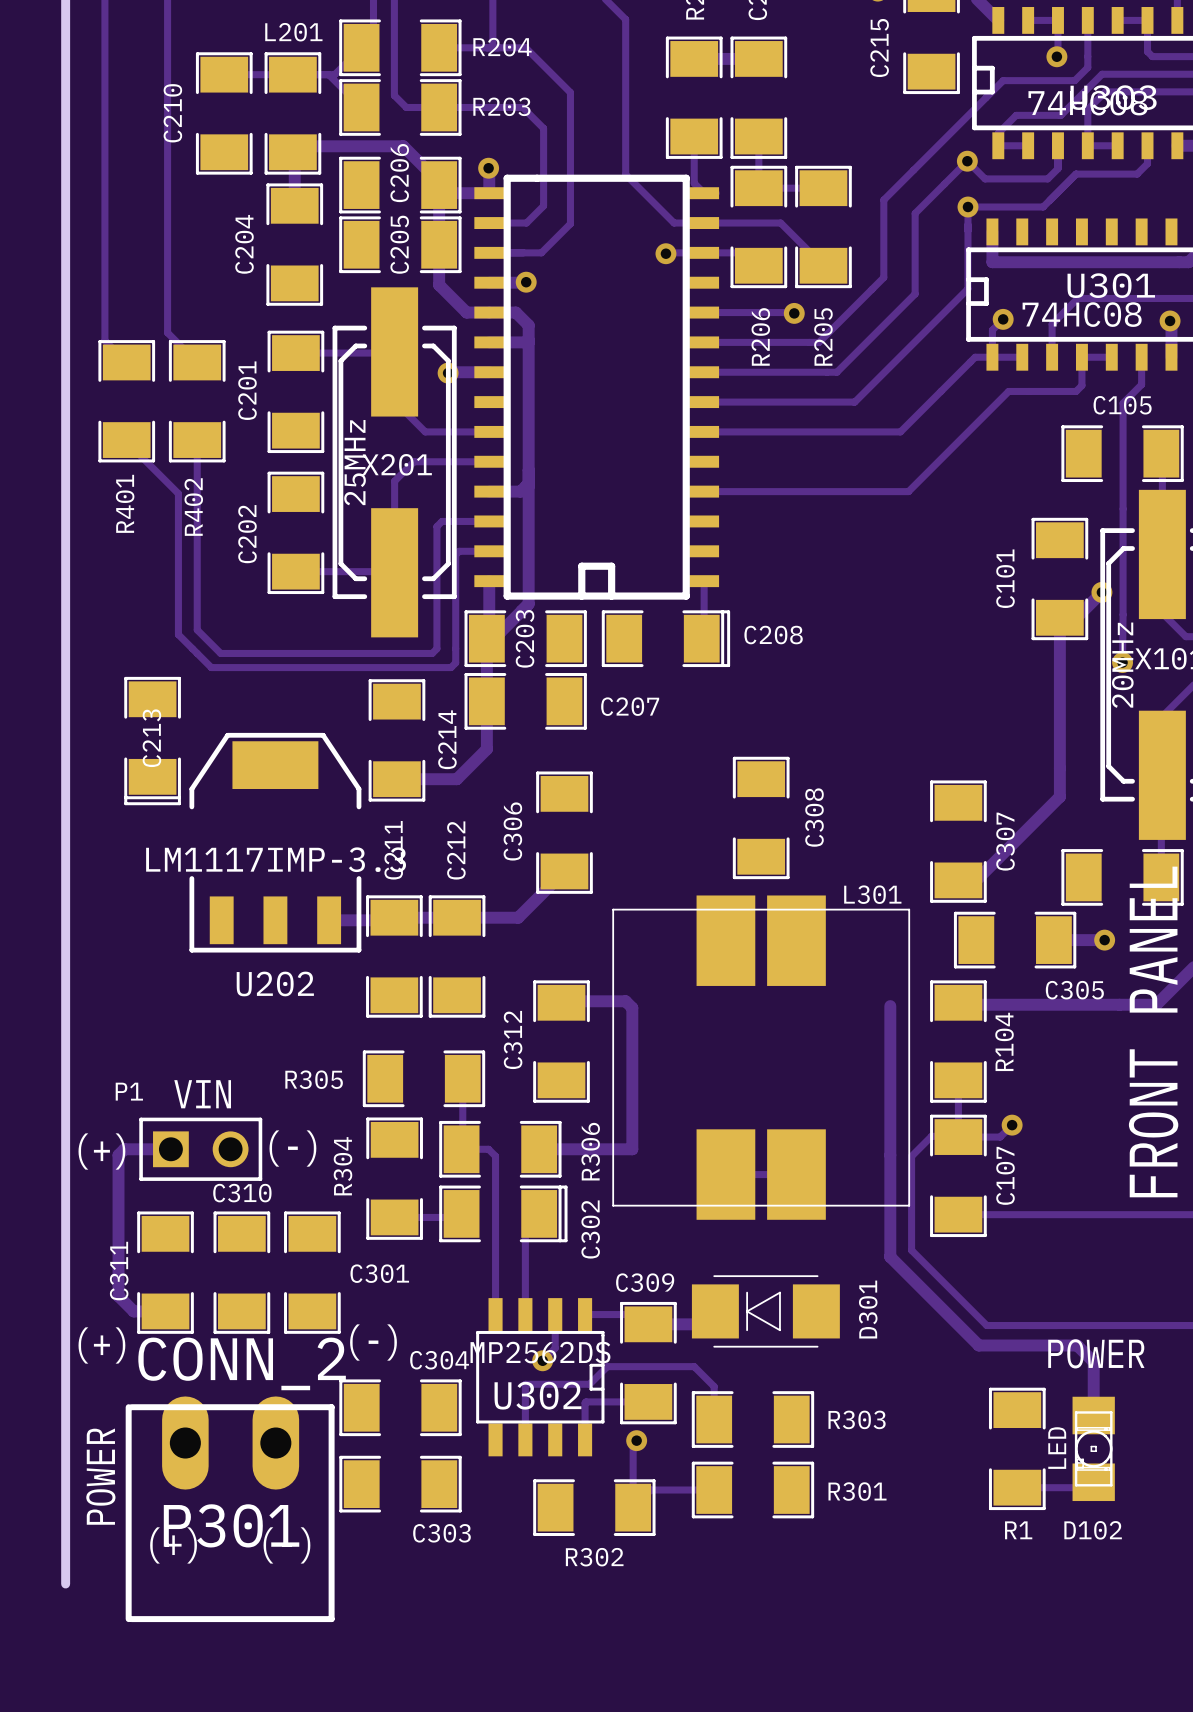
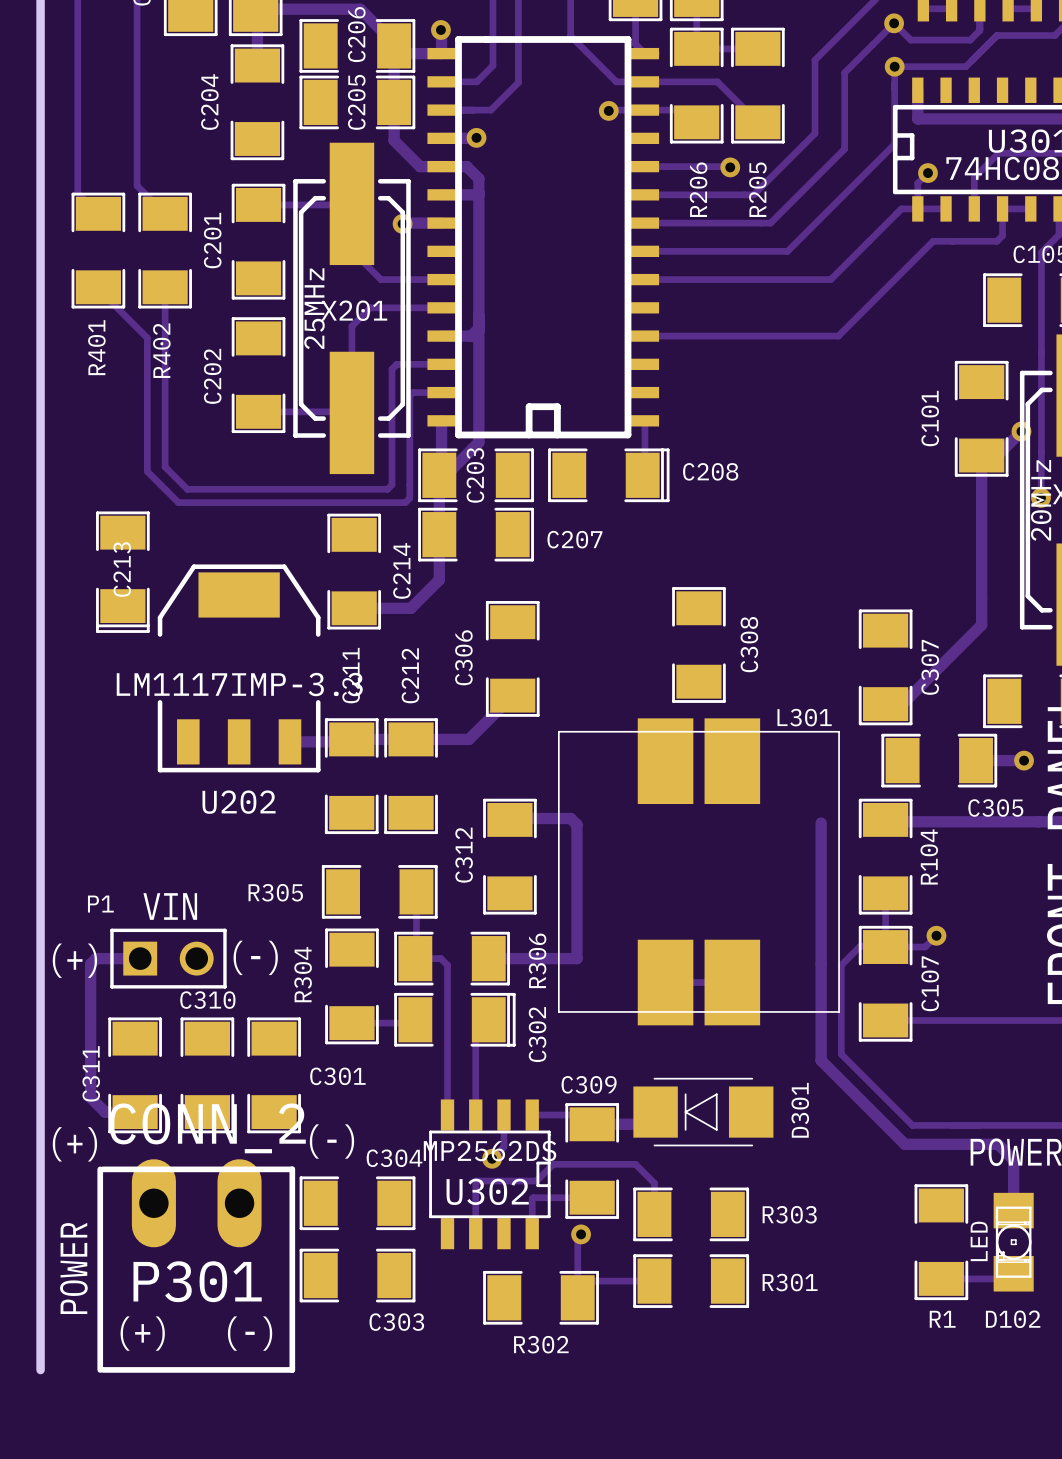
P301 position: (230, 1509) -> (196, 1265)

